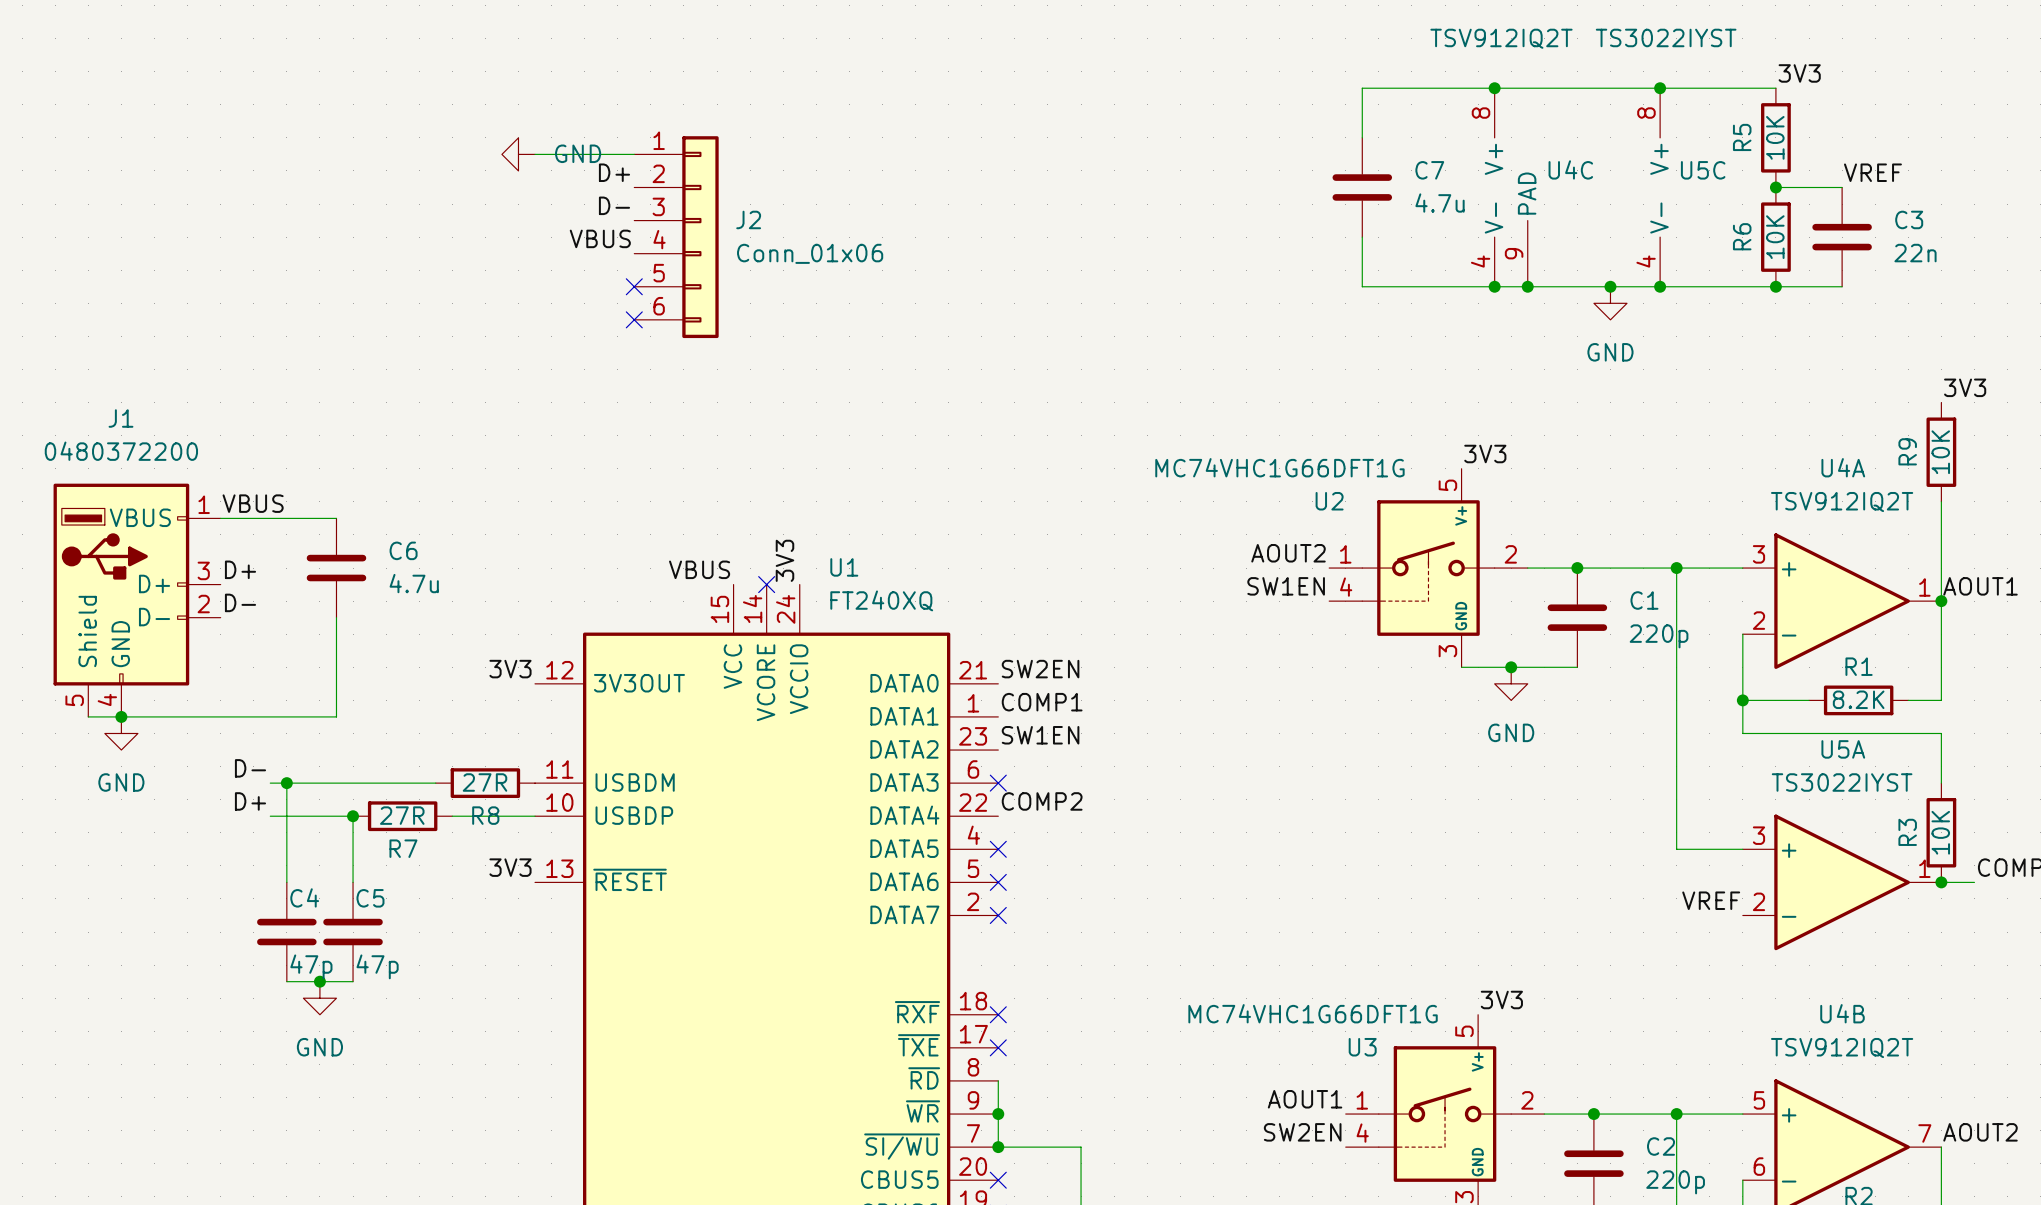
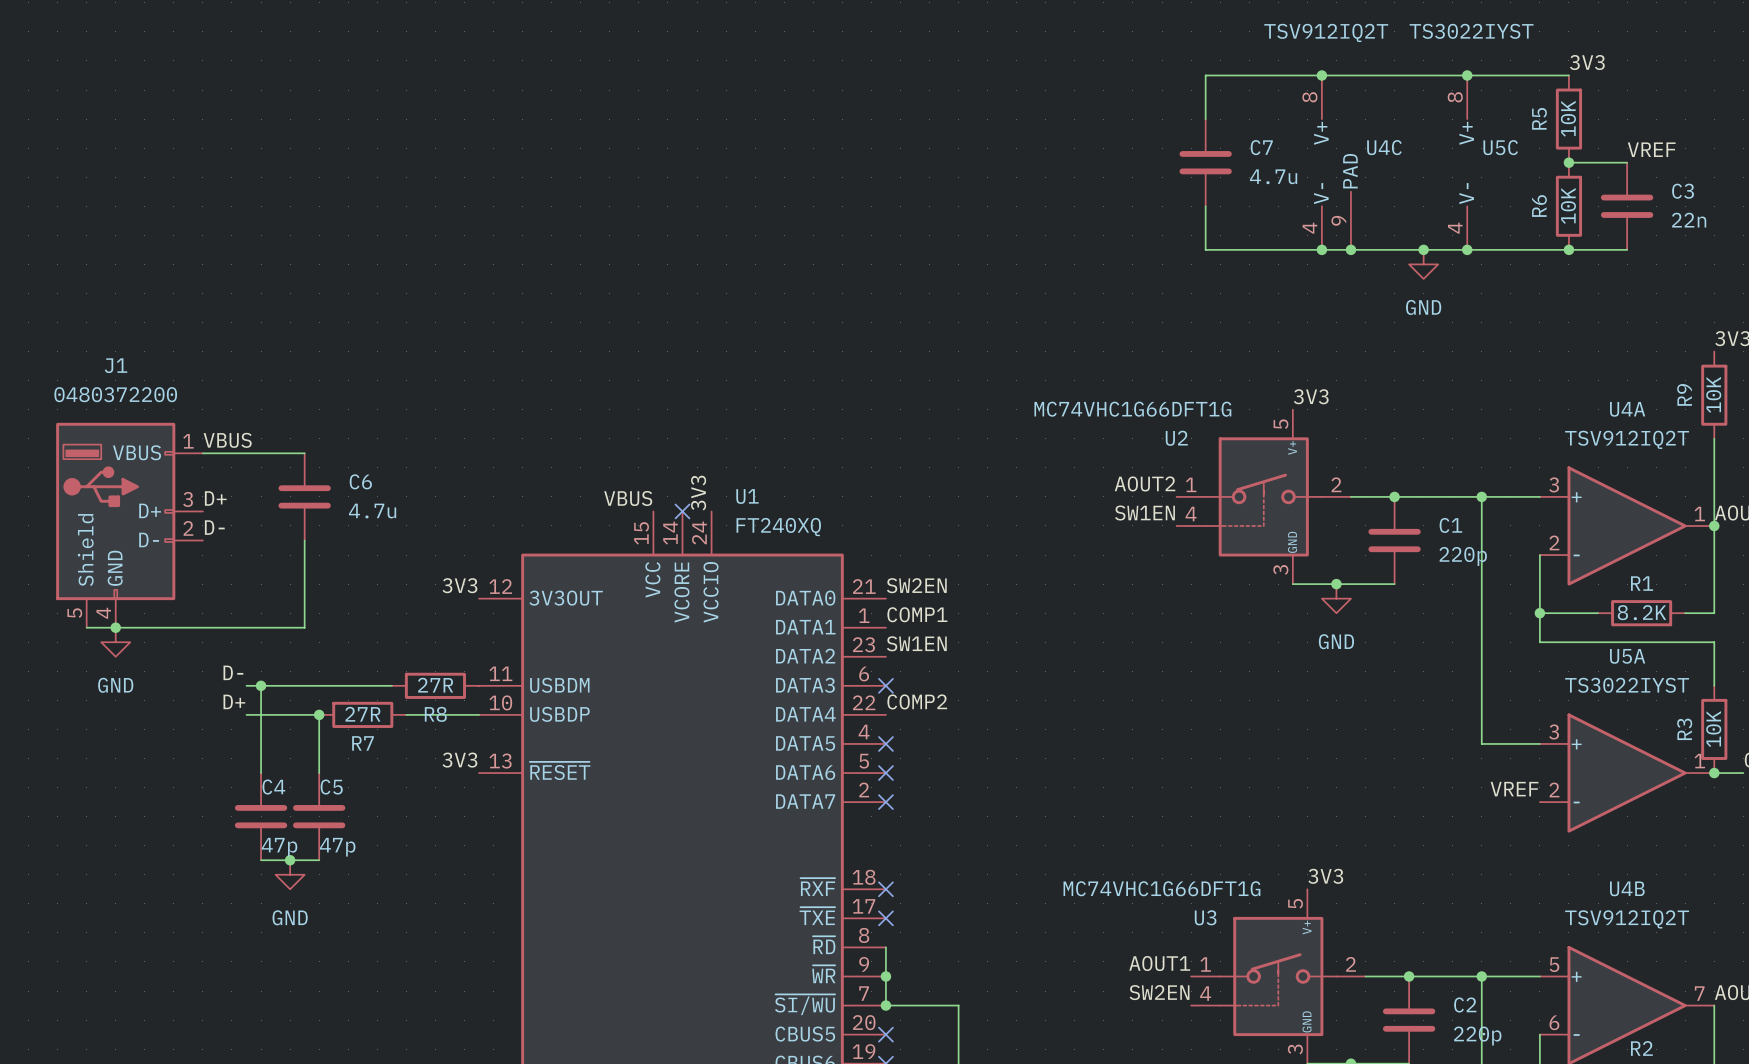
power symbol: GND (518, 154) -> none
wire: (535, 154) (634, 154) -> none
label: D+ (614, 172) -> none
label: D- (614, 205) -> none
J2: Conn_01x06 (676, 237) -> none
label: VBUS (600, 238) -> none
no-connect mark: (634, 286) -> none
no-connect mark: (634, 319) -> none

